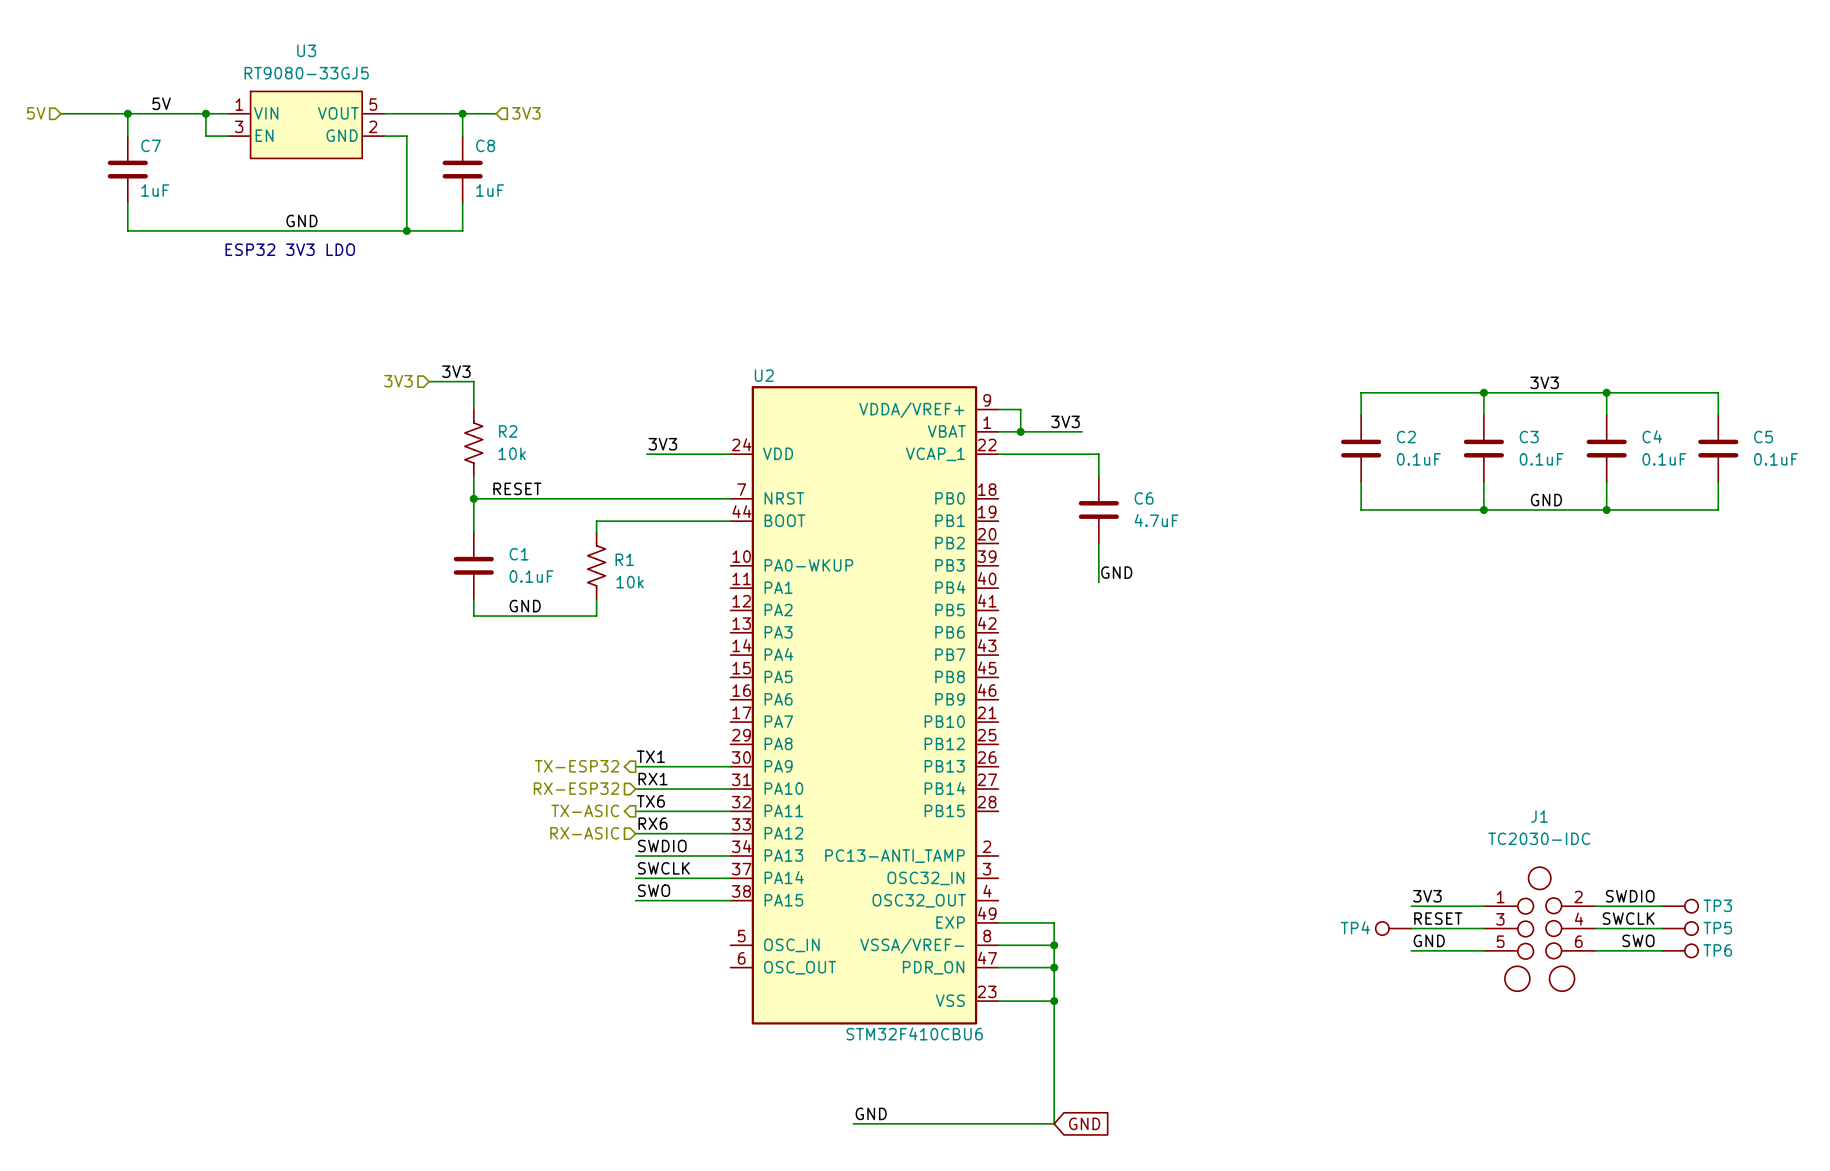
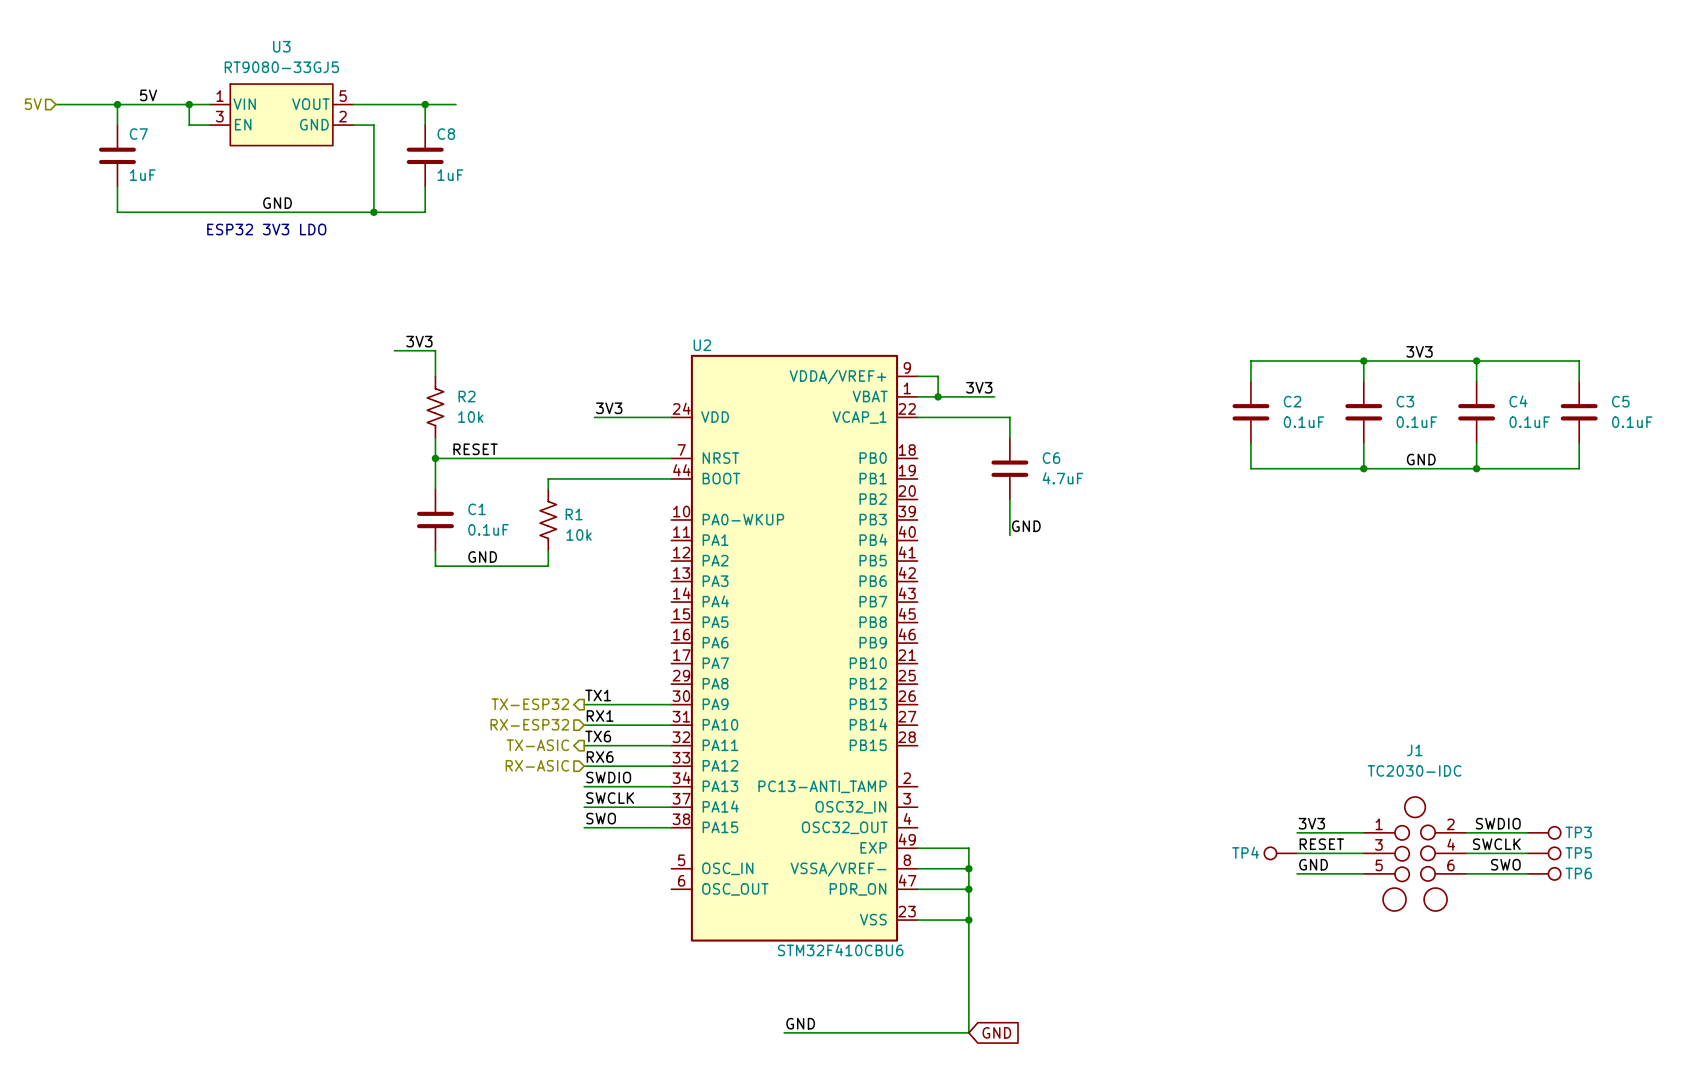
hierarchical label: 3V3 (526, 113) -> none
hierarchical label: 3V3 (398, 381) -> none

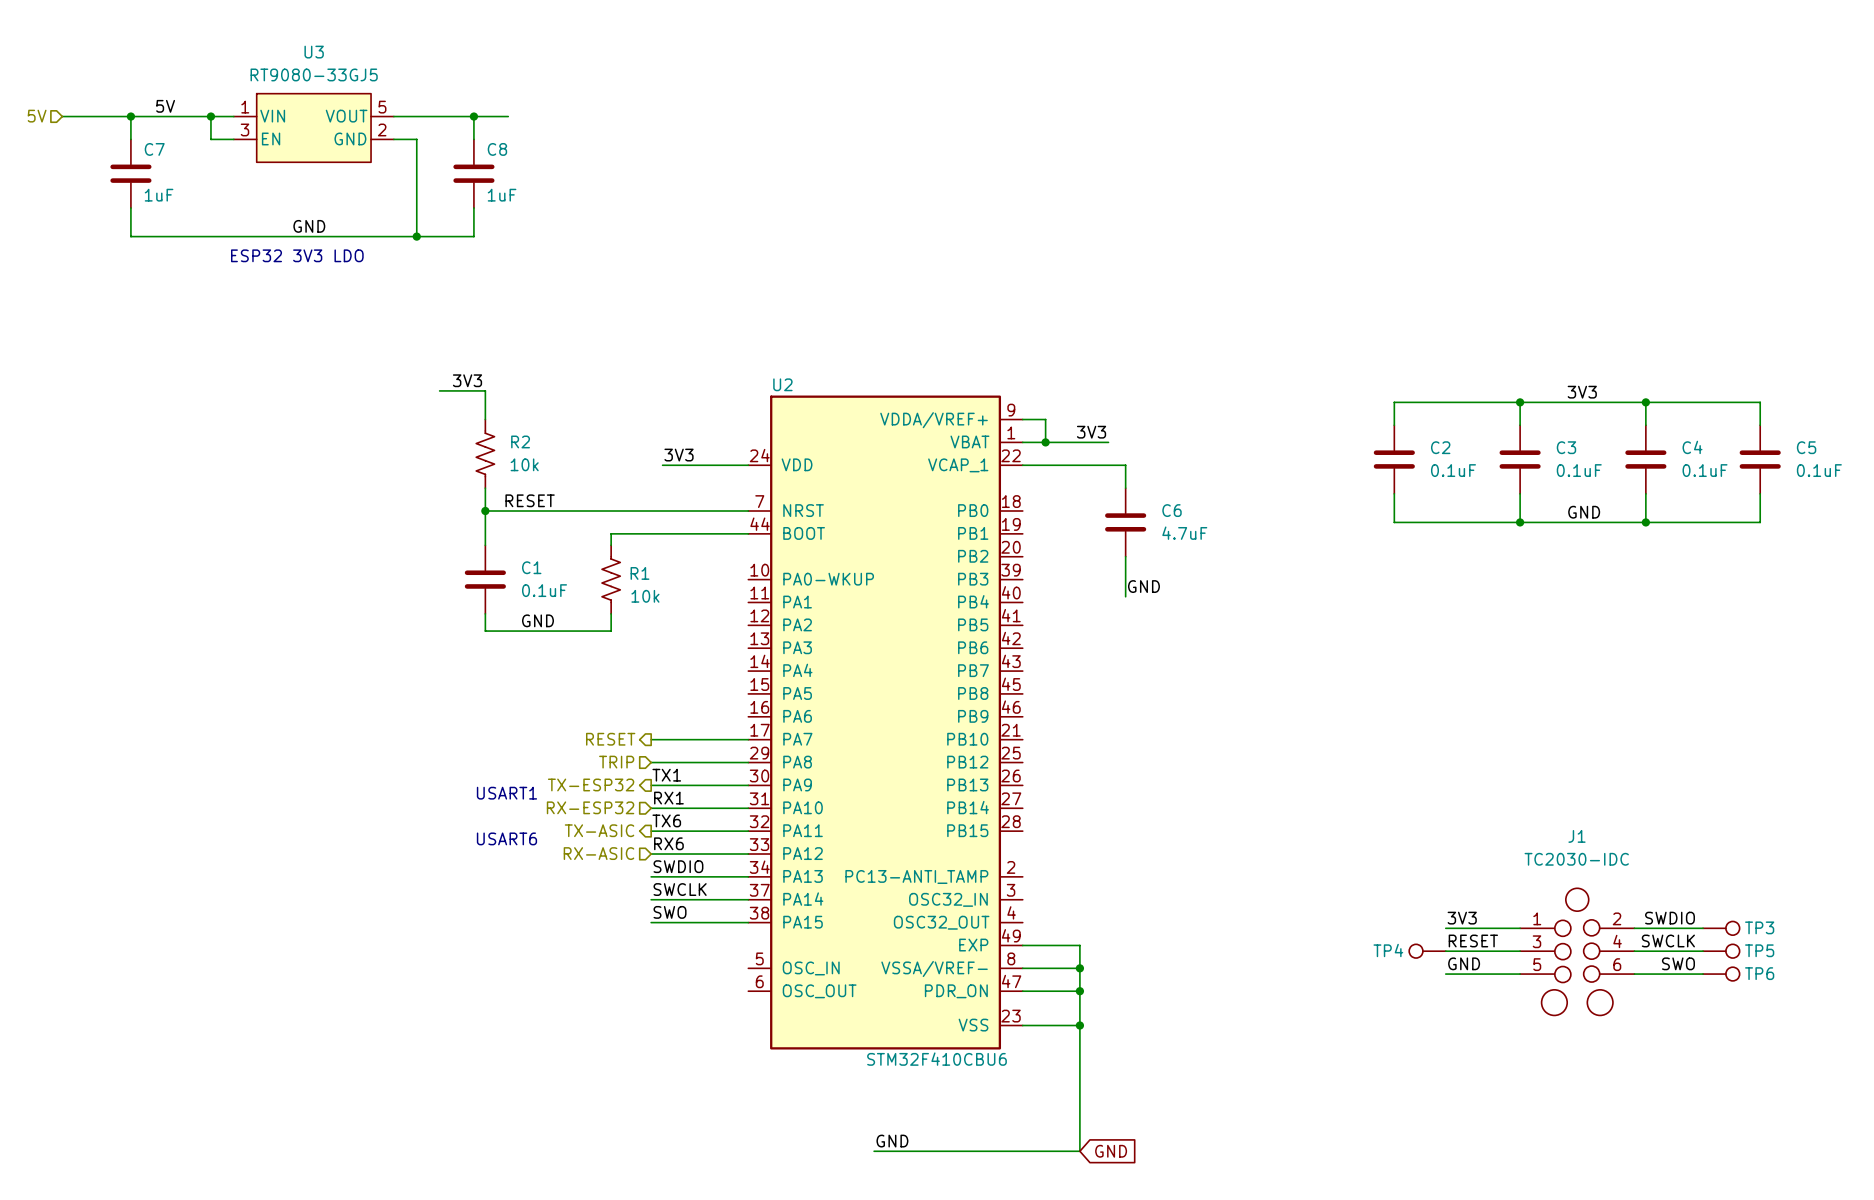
hierarchical label: none -> RESET (610, 739)
wire: none -> (651, 739) (748, 739)
hierarchical label: none -> TRIP (616, 762)
wire: none -> (651, 762) (748, 762)
text: none -> USART1 (506, 793)
text: none -> USART6 (506, 838)

